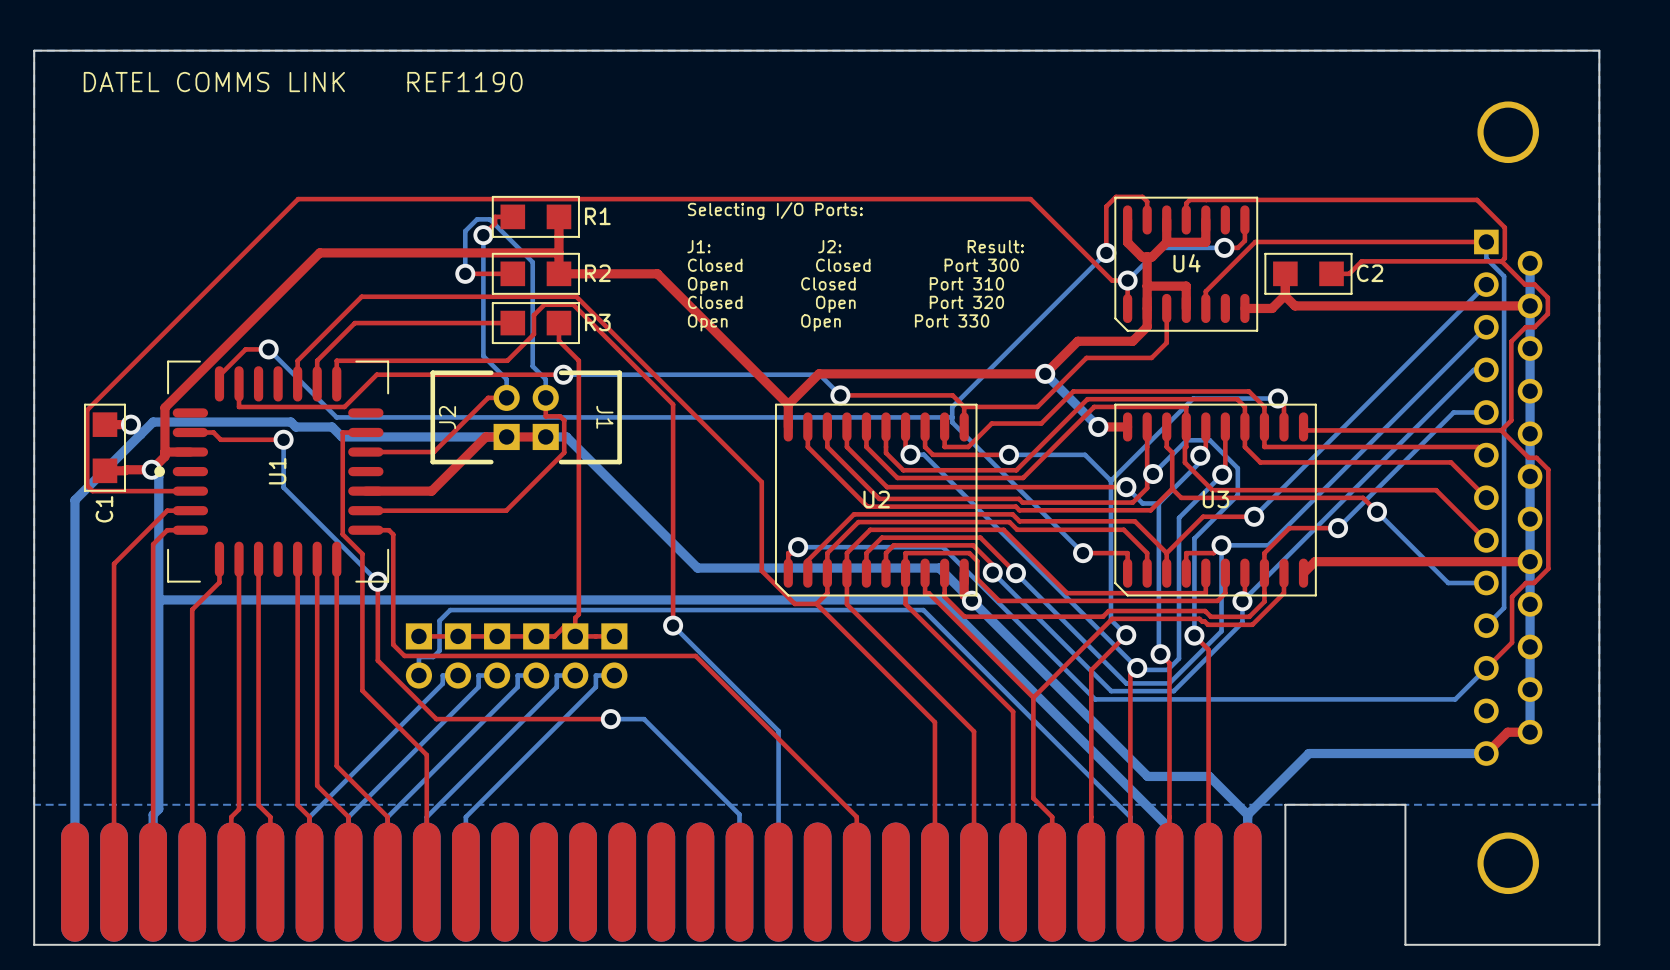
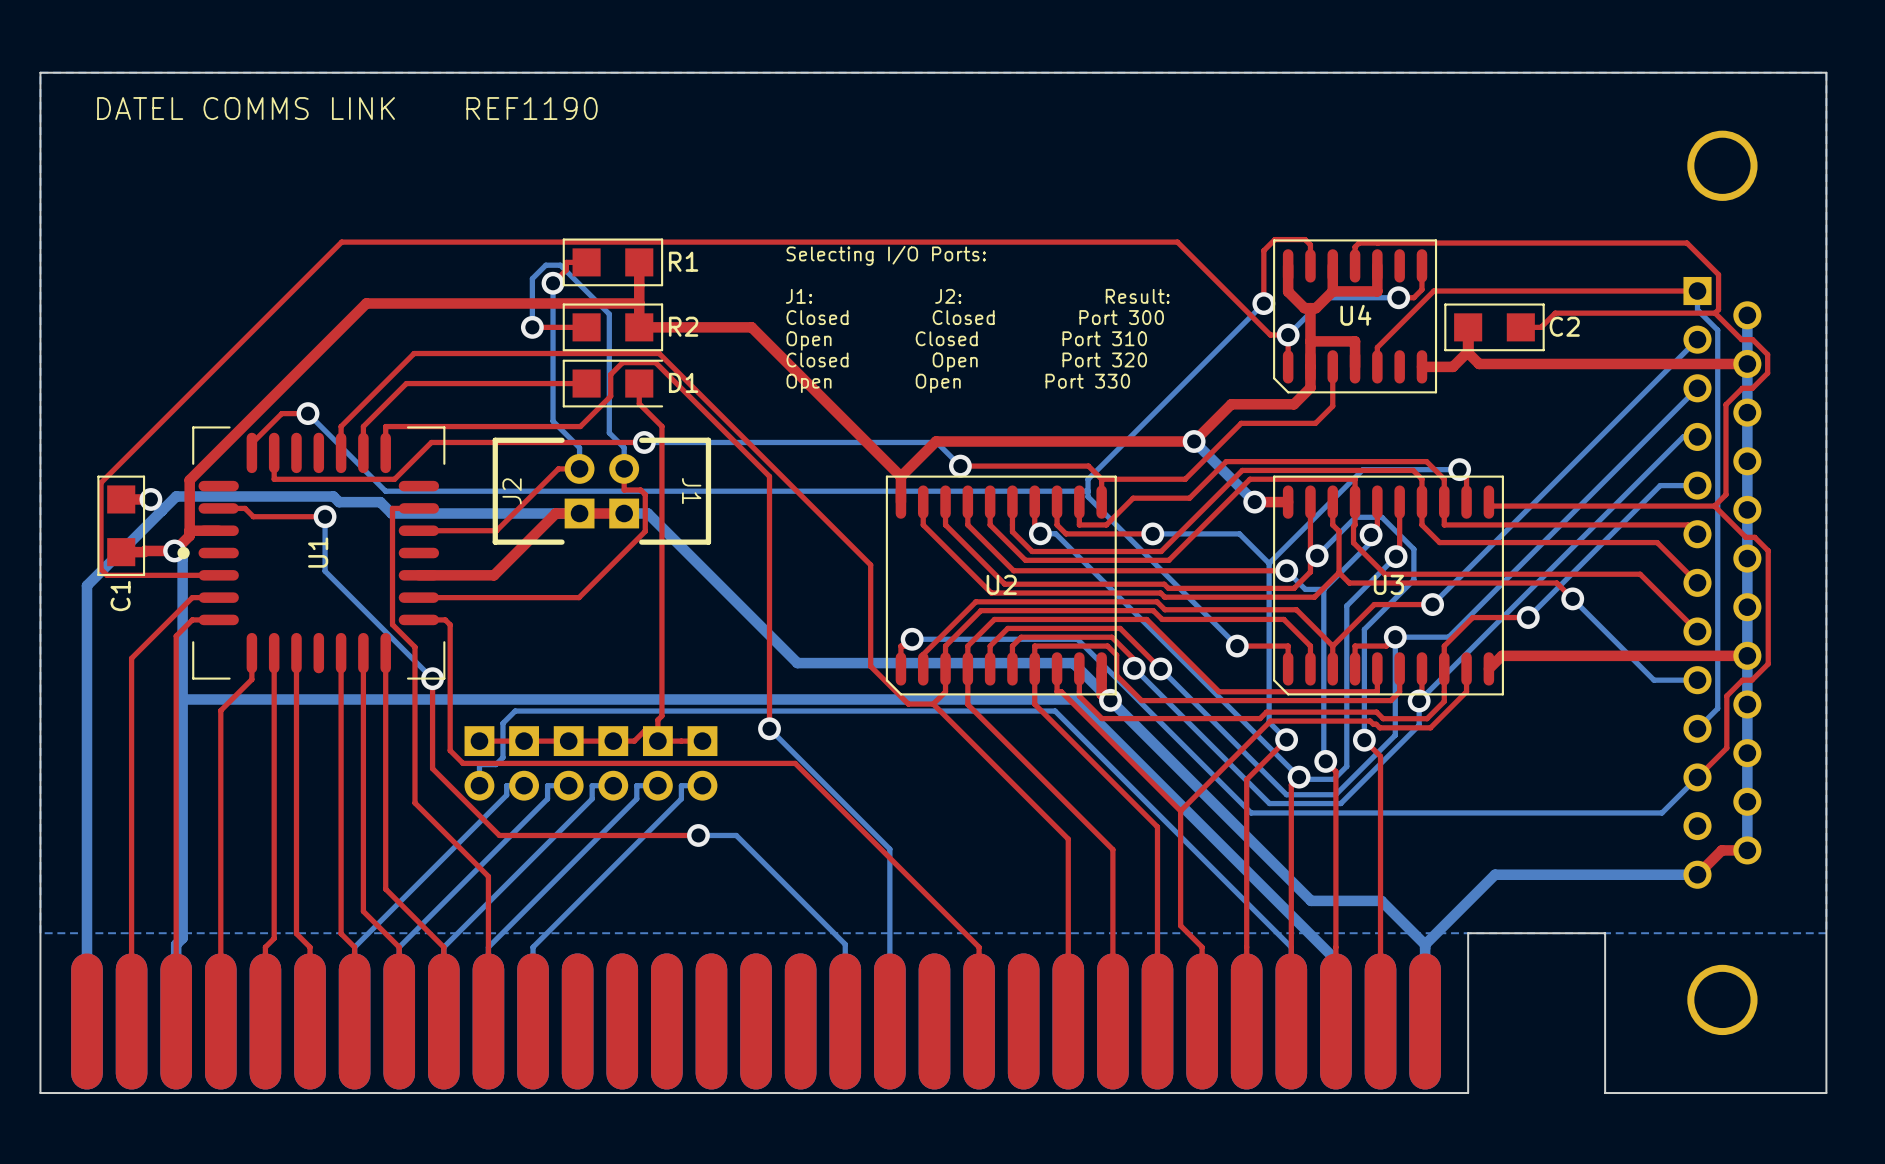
R3: (535, 323) -> none
D1: none -> (612, 383)

